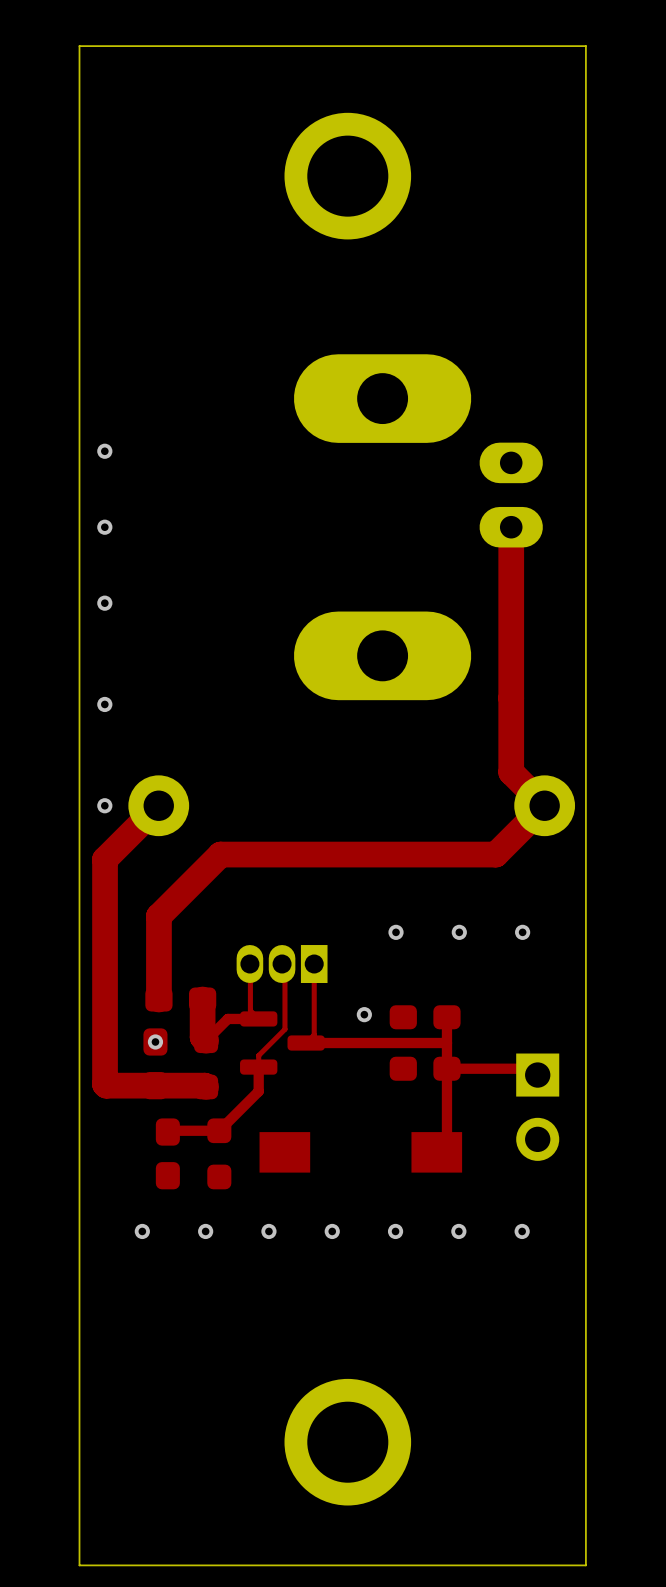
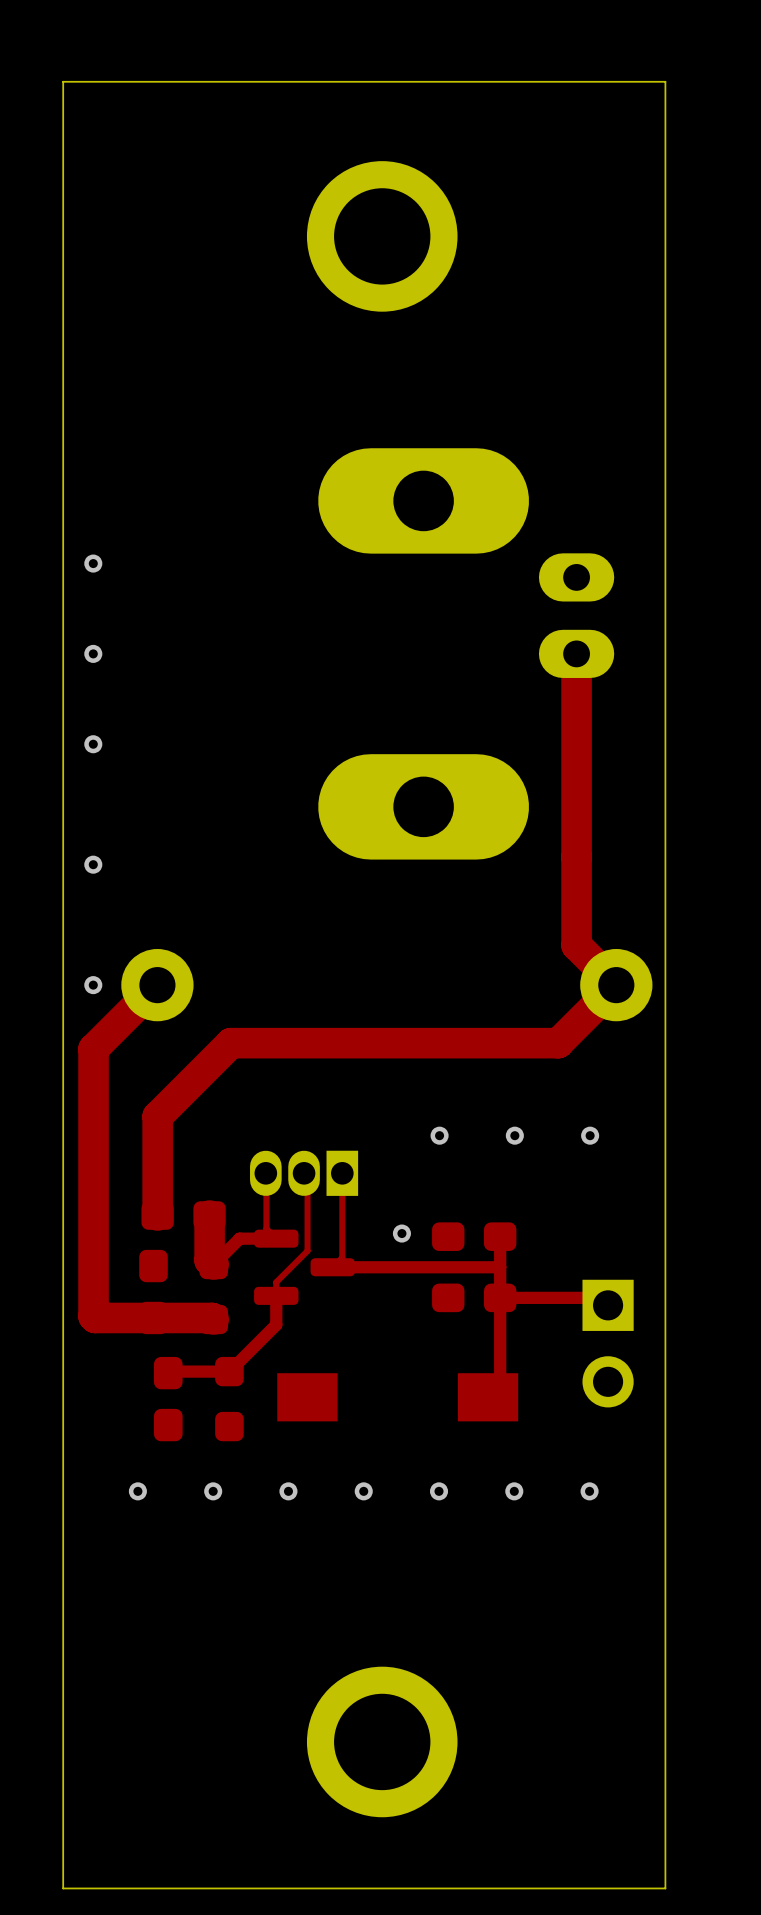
via: (155, 1041) -> none

